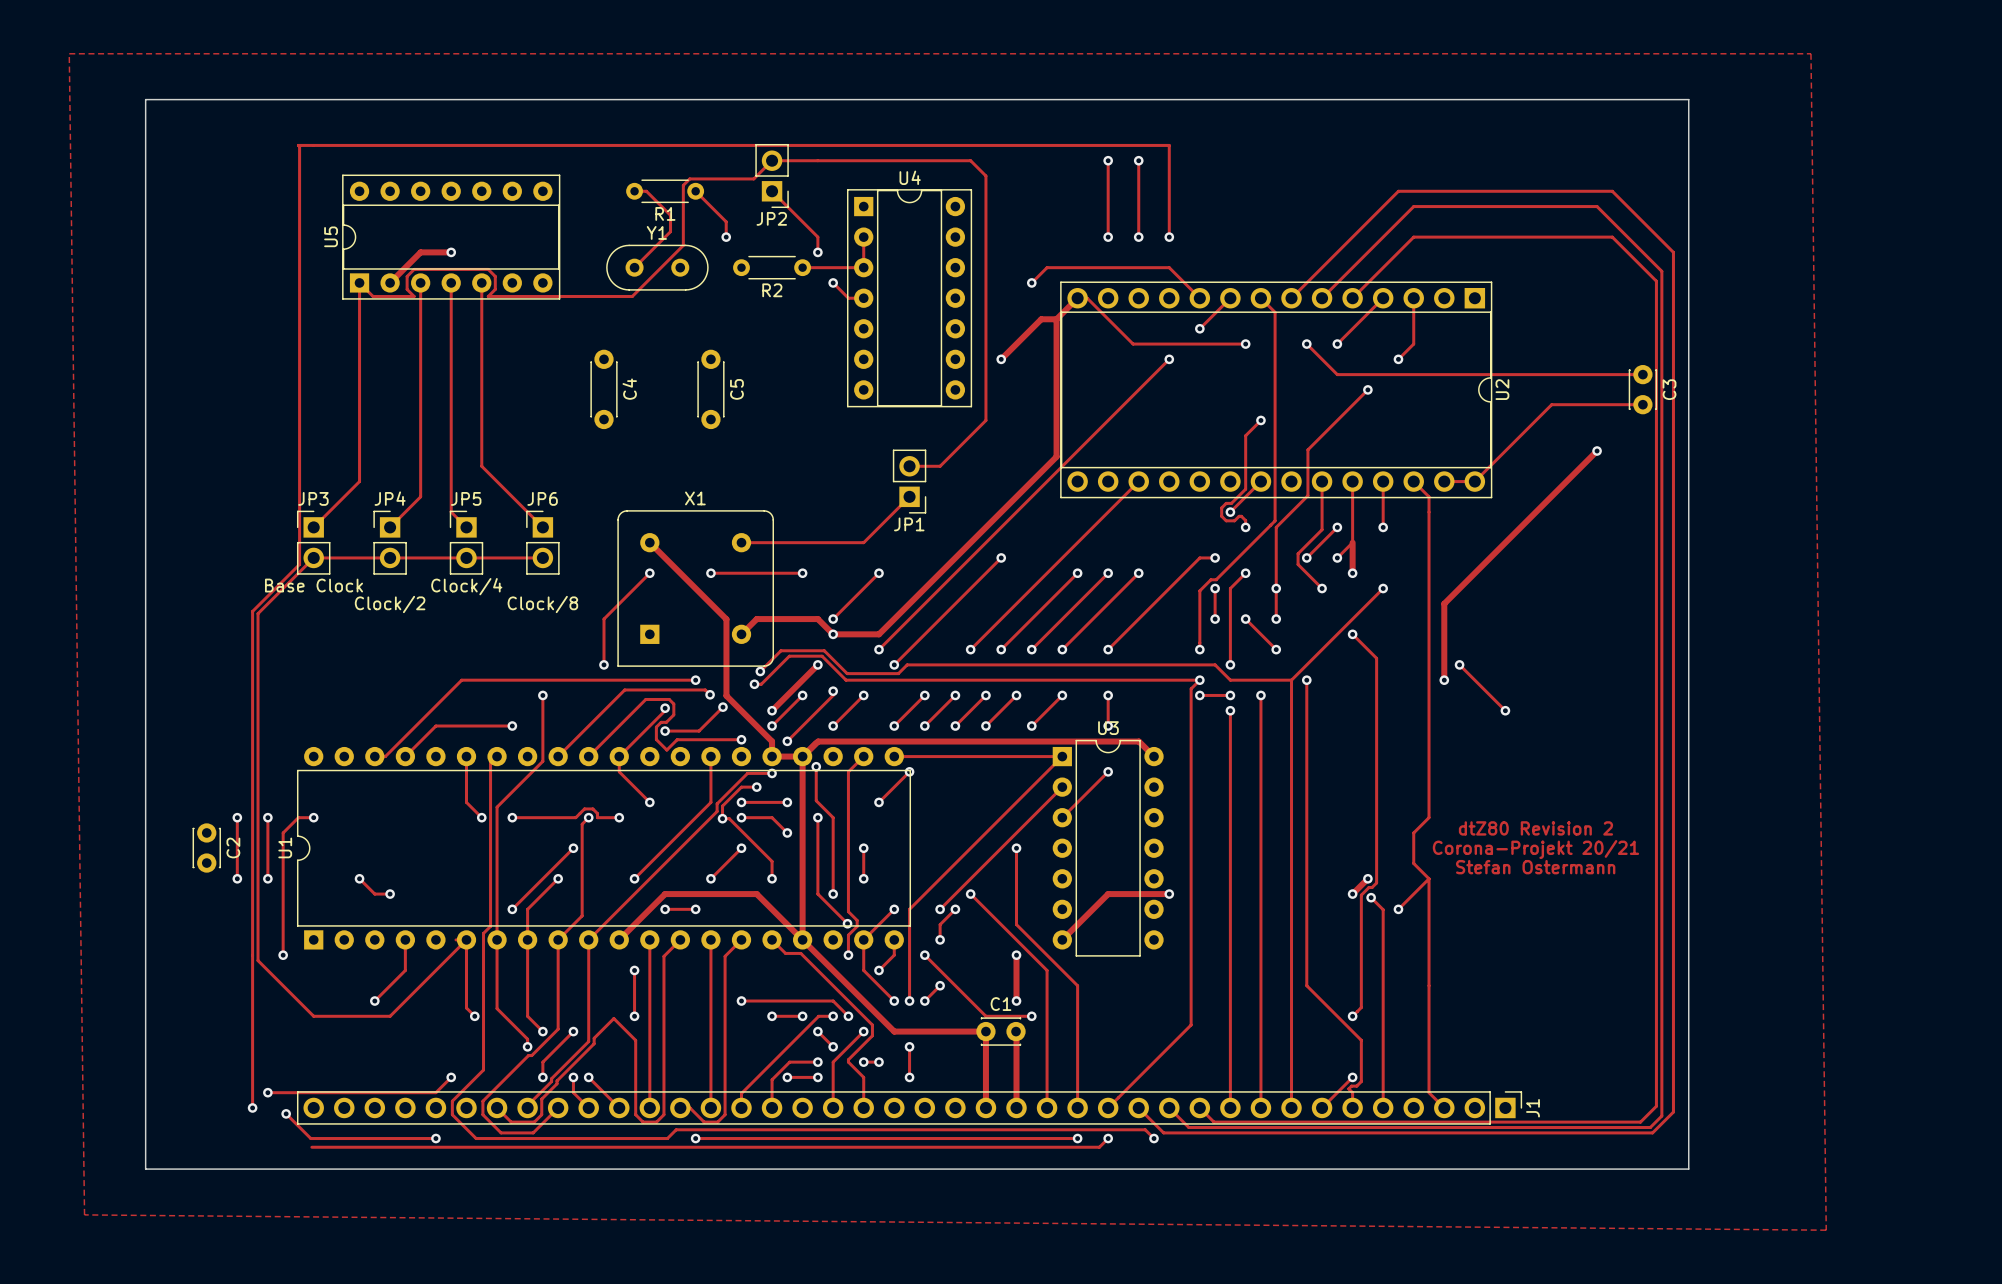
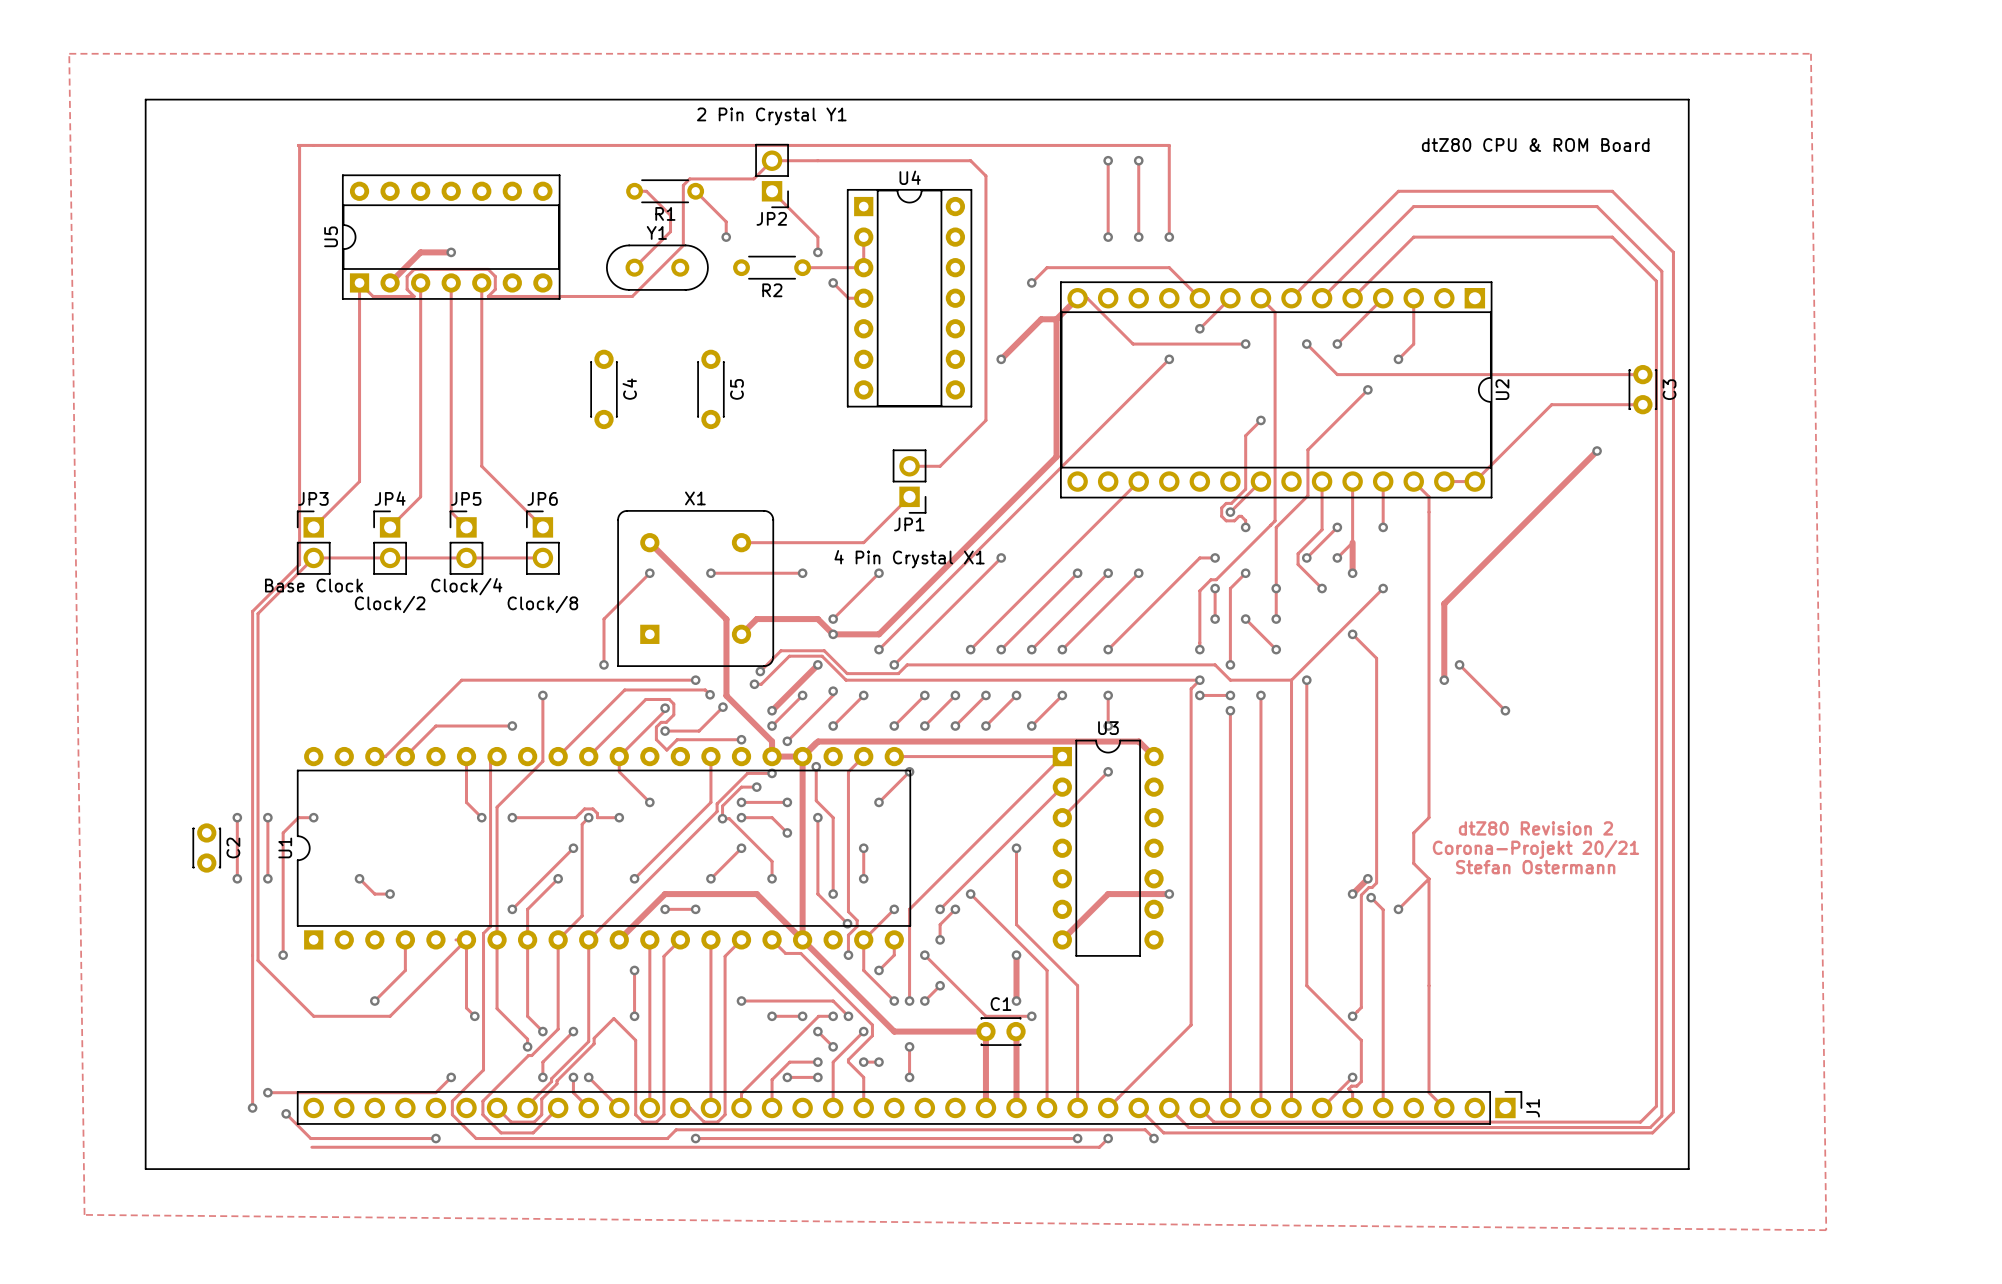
text: none -> 2 Pin Crystal Y1 (771, 116)
text: none -> dtZ80 CPU & ROM Board (1535, 144)
text: none -> 4 Pin Crystal X1 (909, 559)

